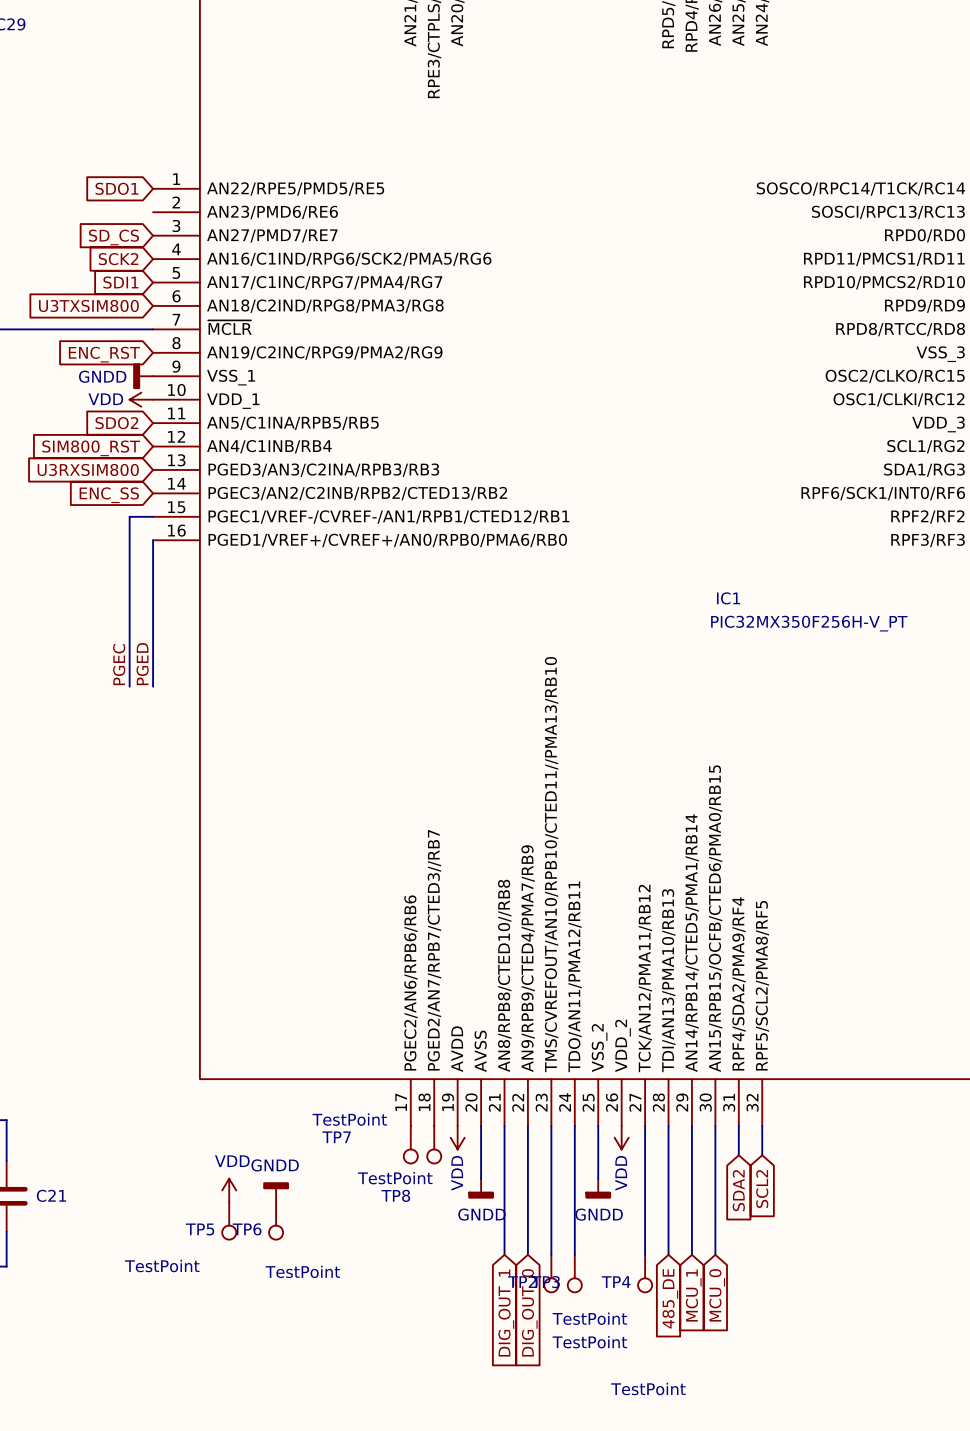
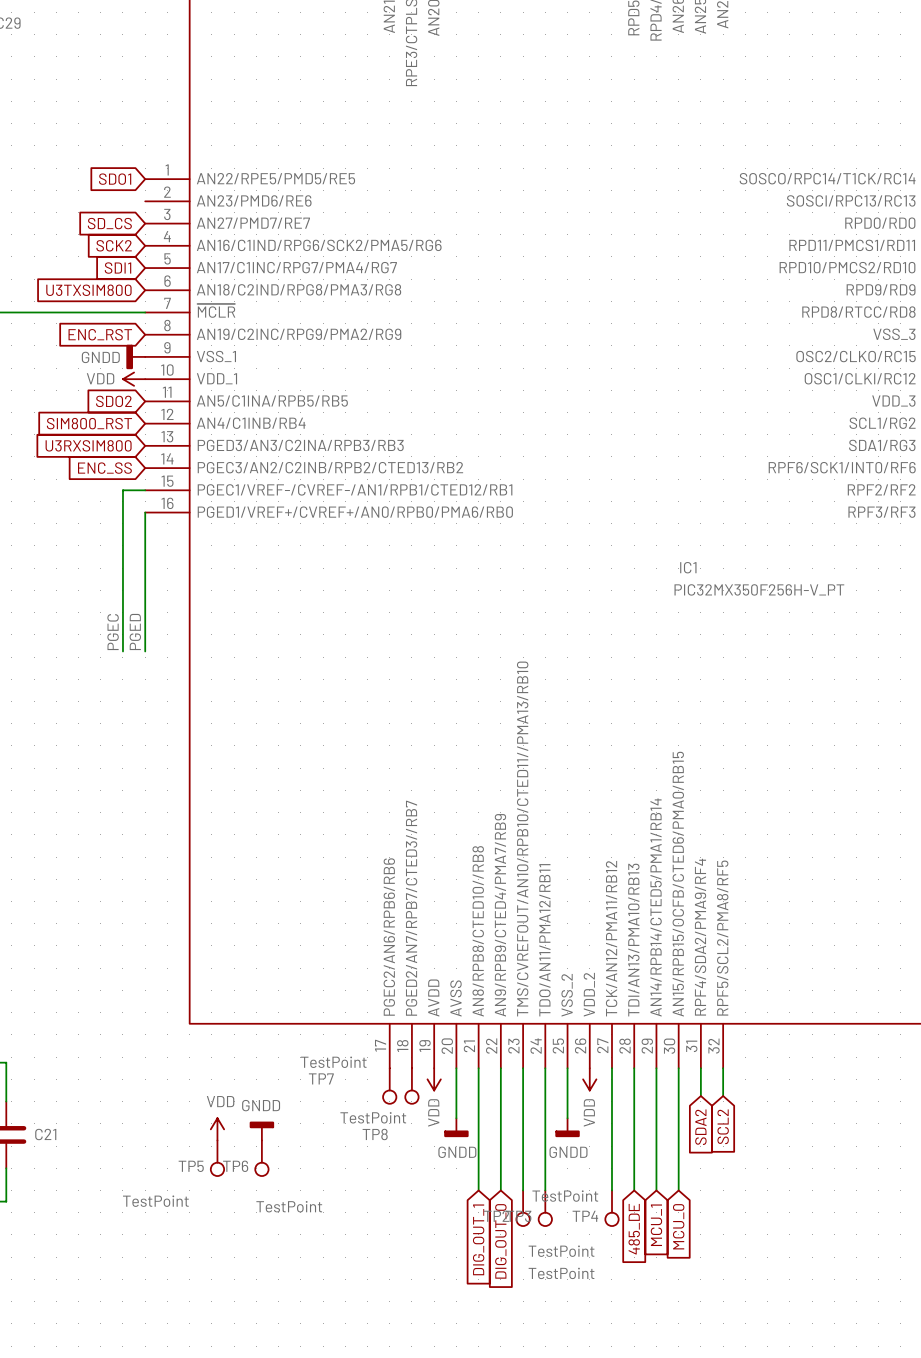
TP4 value position: TestPoint (648, 1389) -> TestPoint (565, 1196)

